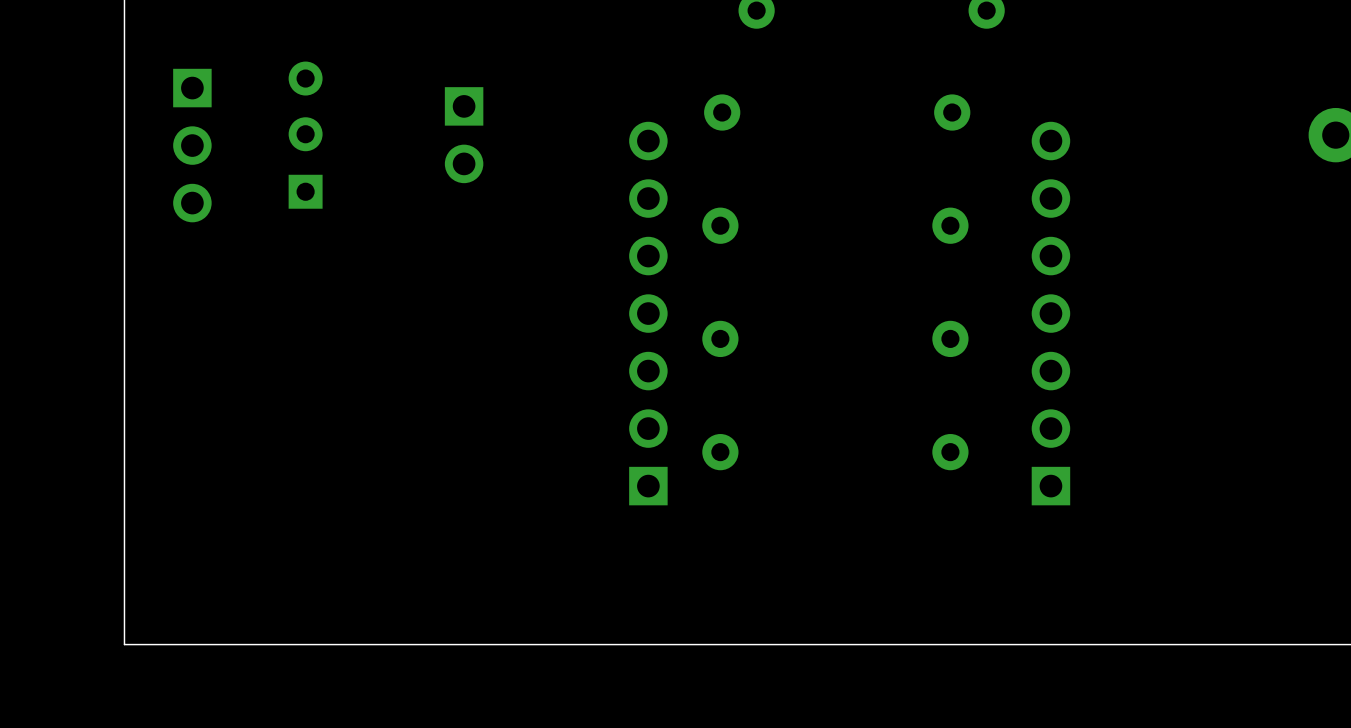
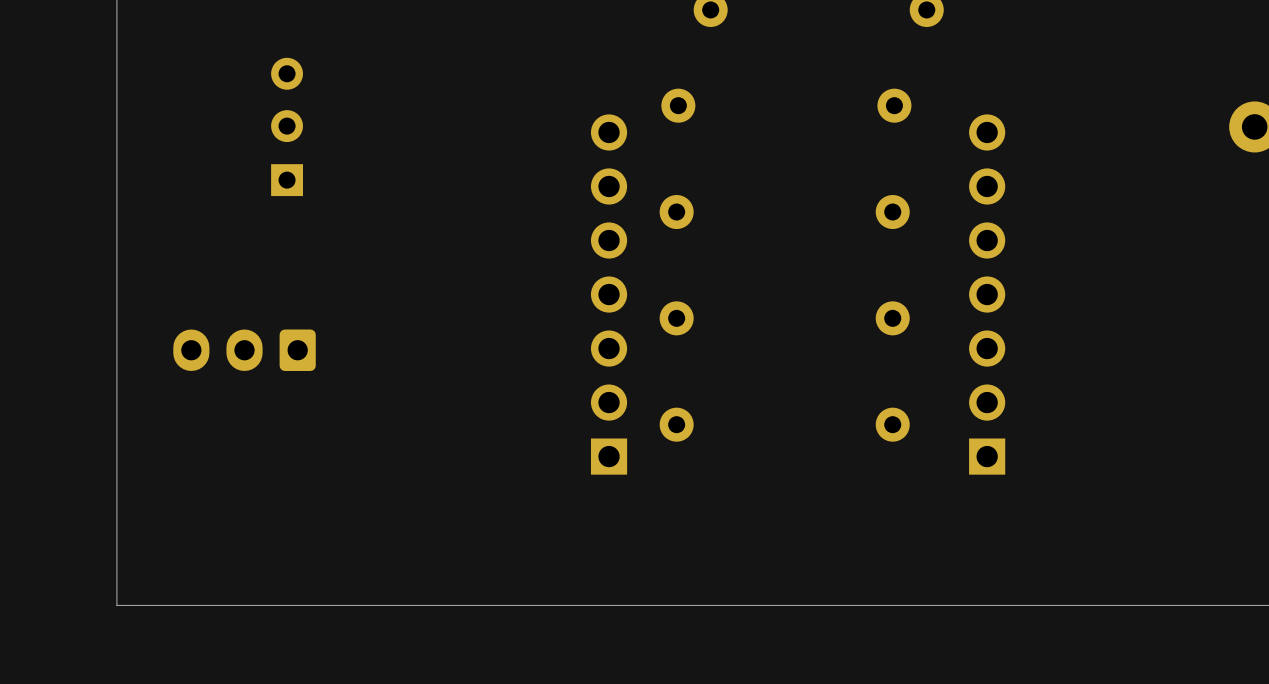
part: (464, 135) -> none
part: (192, 145) -> none
part: none -> (244, 350)

